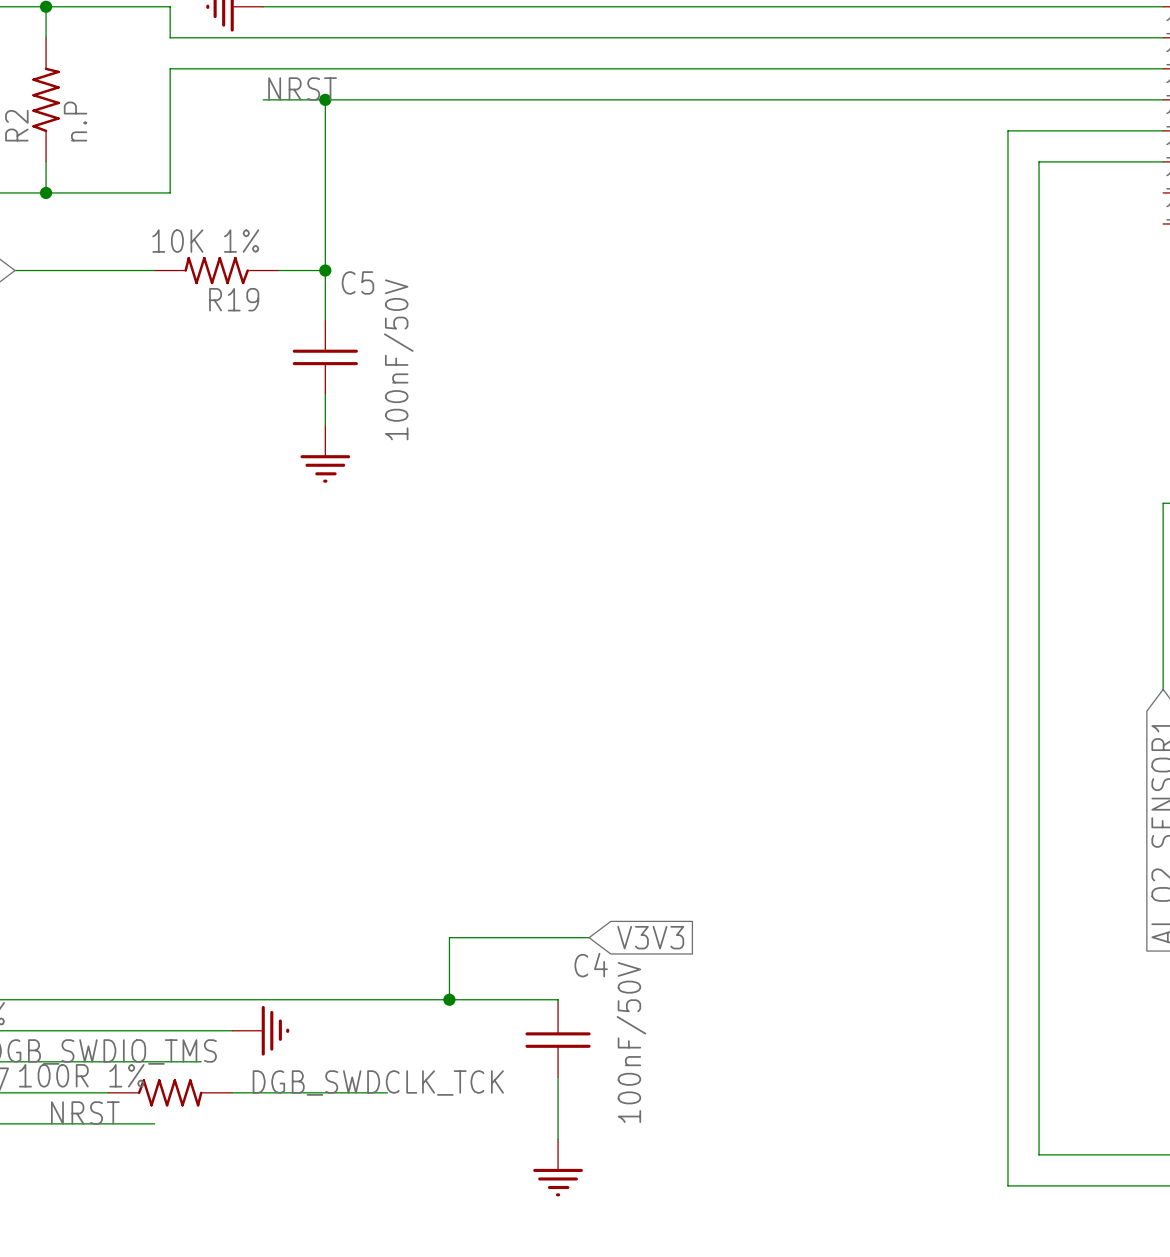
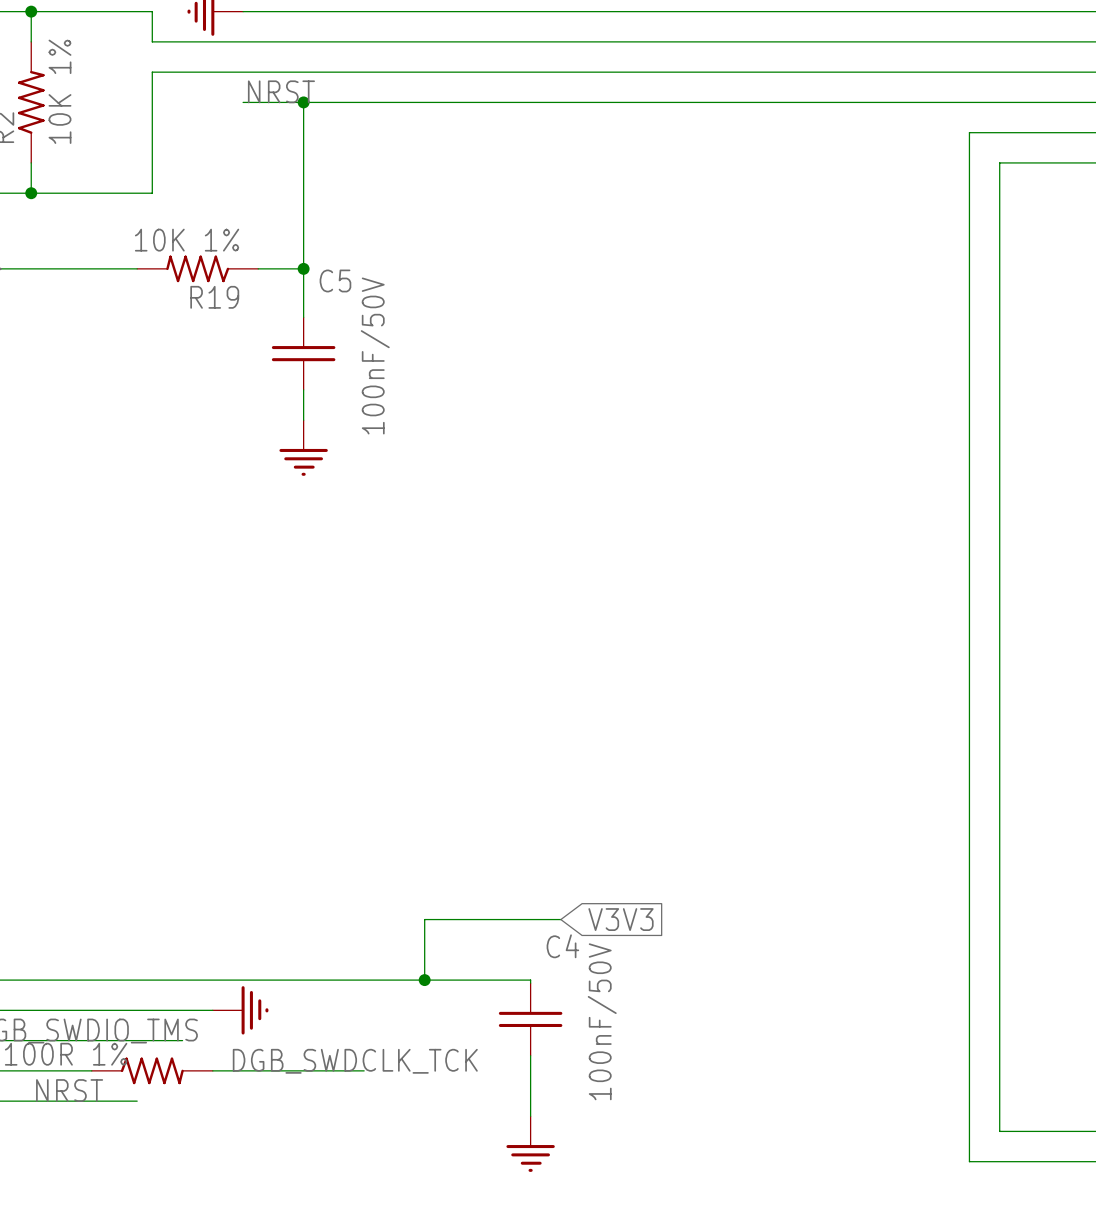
R2 value: n.P (75, 121) -> 10K 1% (60, 91)

